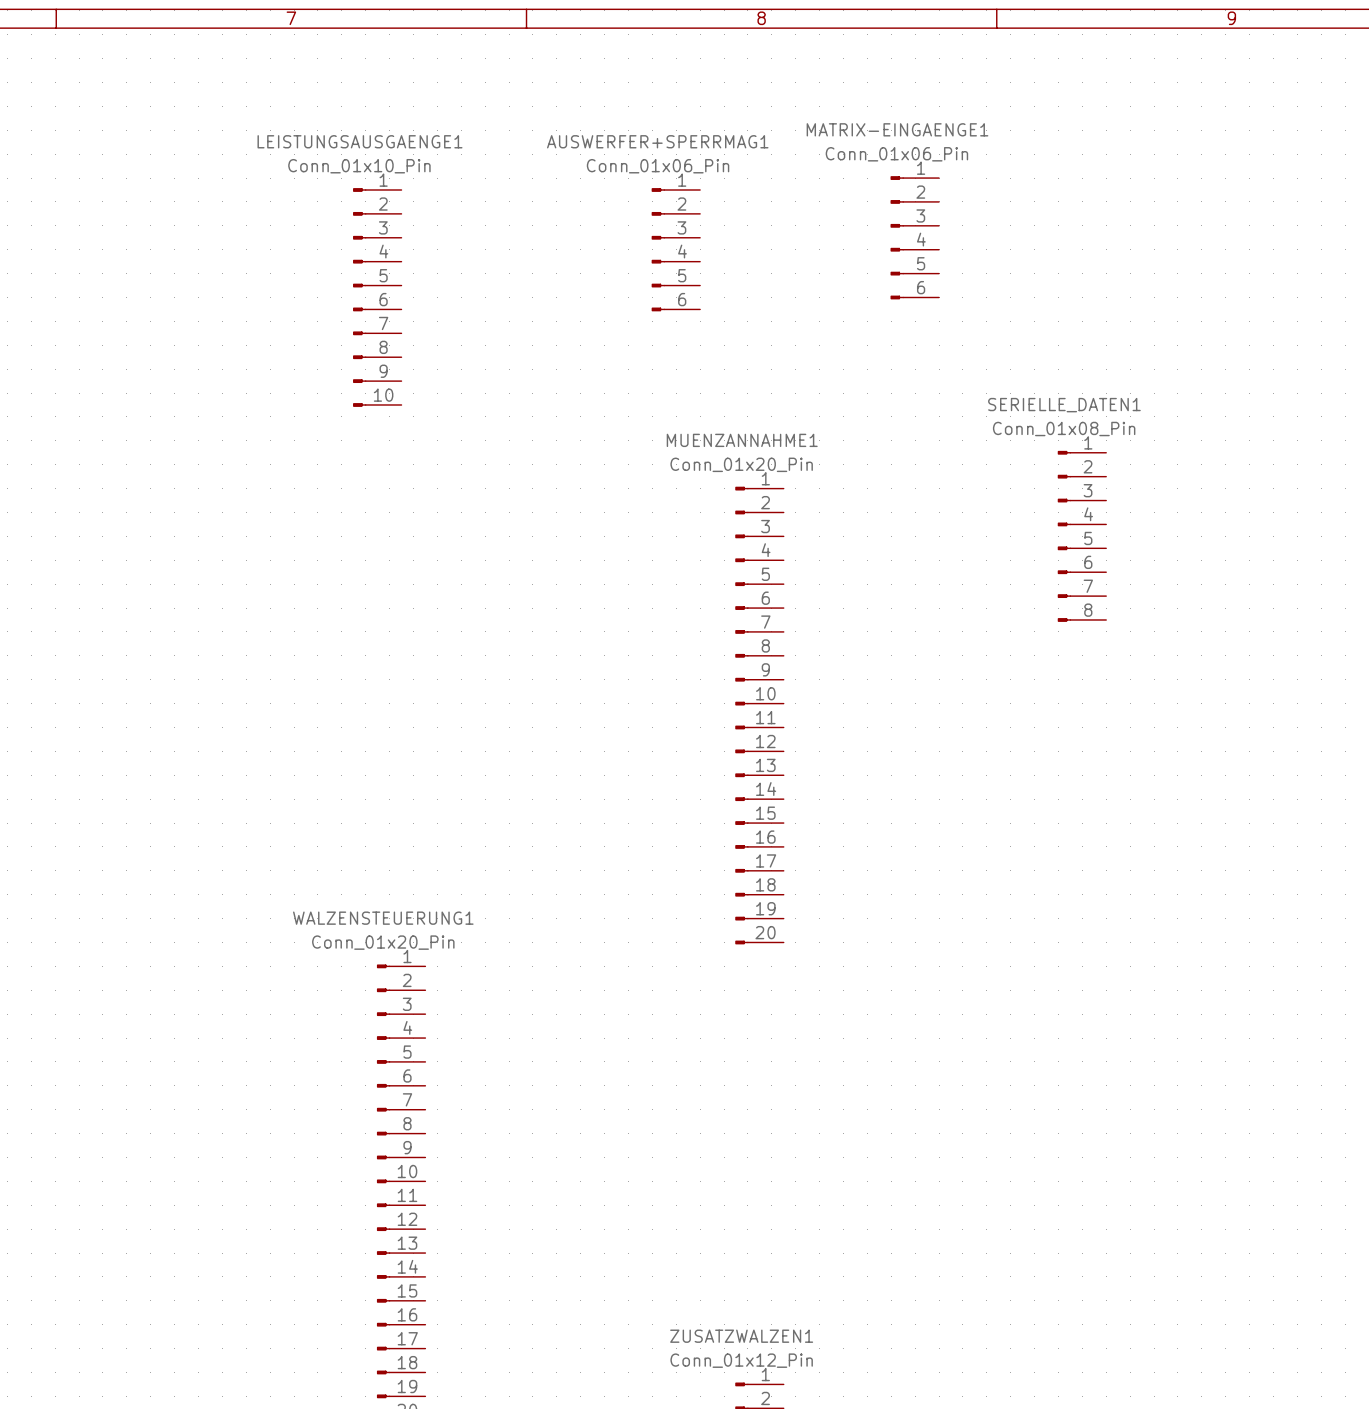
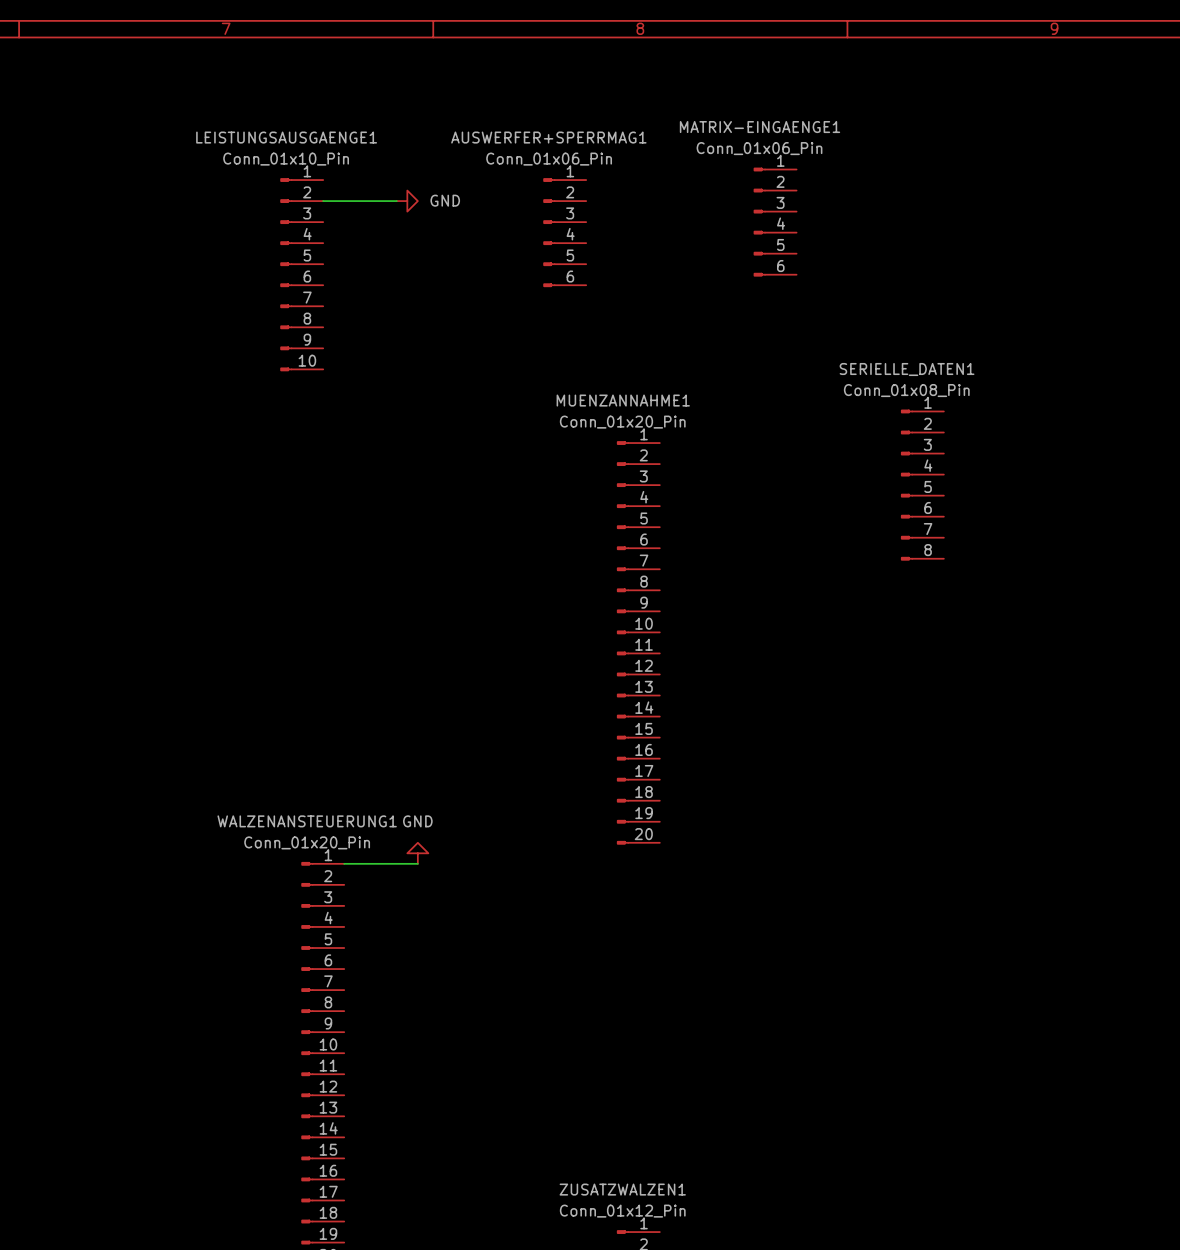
wire: none -> (323, 201) (396, 201)
power symbol: none -> GND (407, 201)
WALZENSTEUERUNG1 name: WALZENSTEUERUNG1 (383, 918) -> WALZENANSTEUERUNG1 (307, 821)
power symbol: none -> GND (417, 853)
wire: none -> (344, 863) (417, 863)

